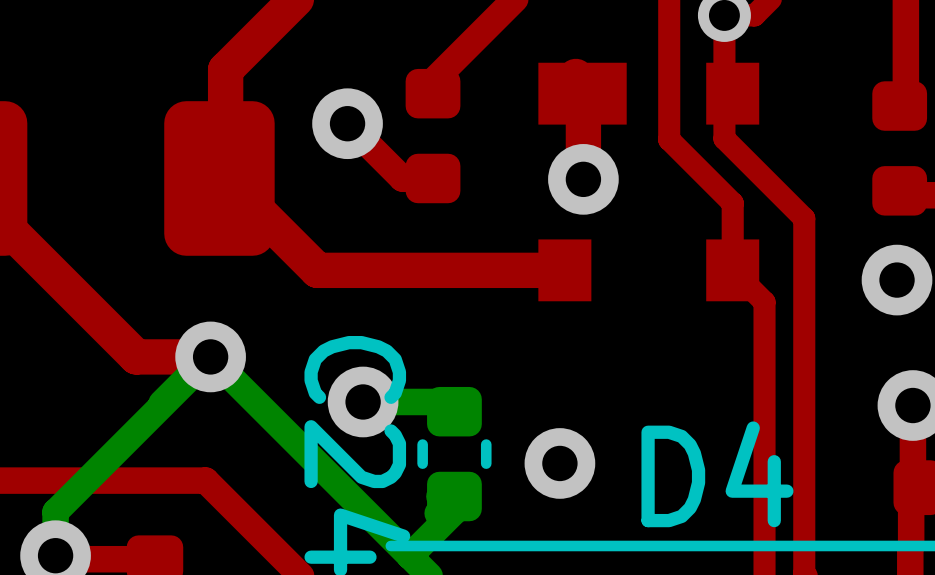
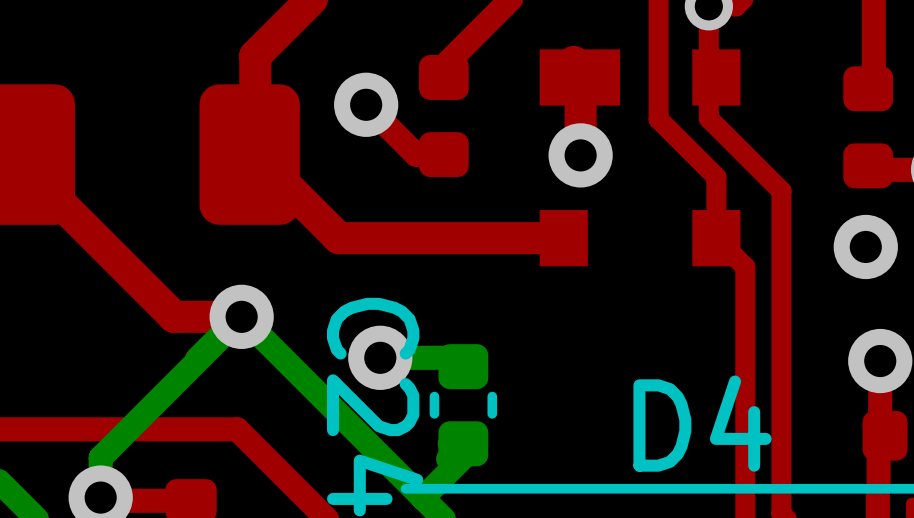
via: (559, 463) -> none

